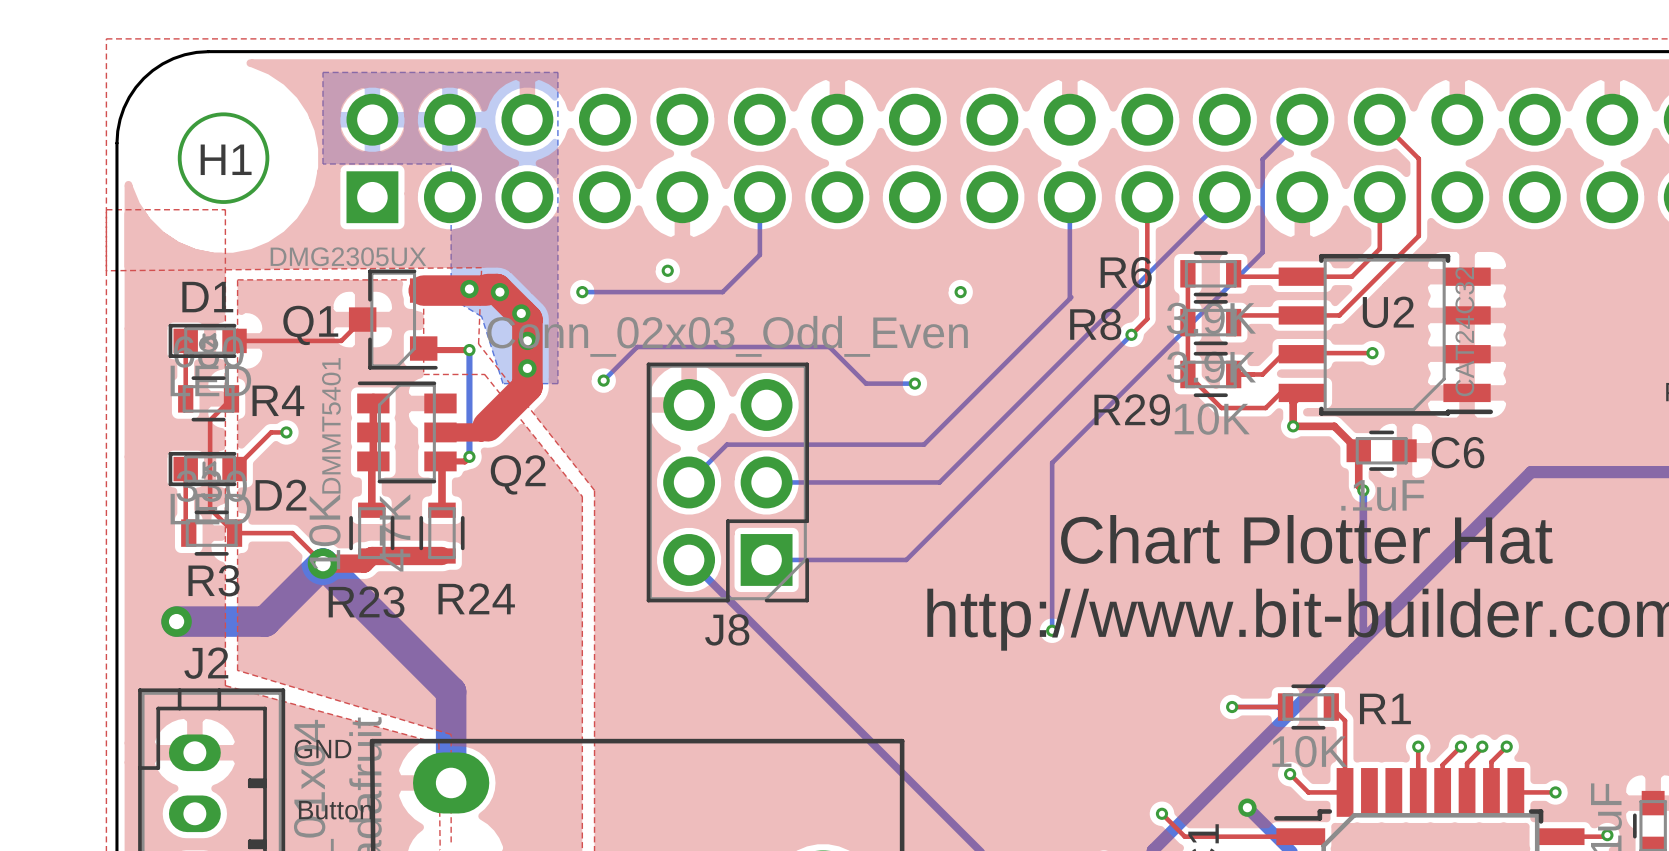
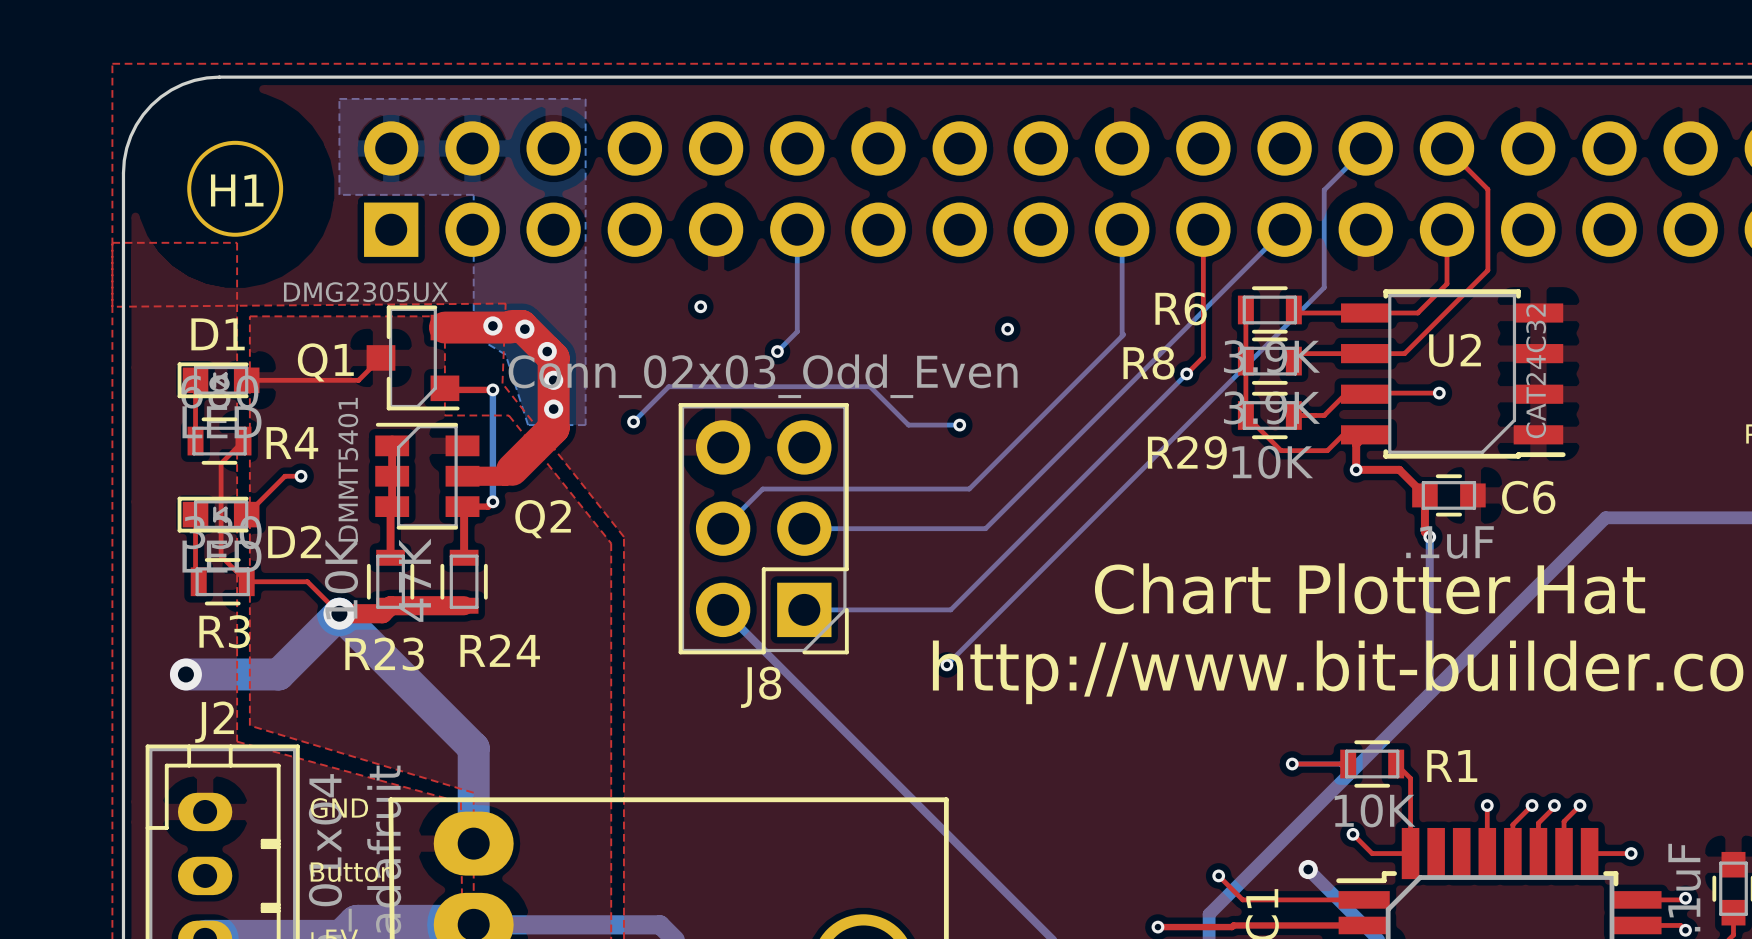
bottom track: (759, 254) (722, 292) (582, 292) -> (797, 290) (797, 331) (777, 351)
via position: (582, 292) -> (777, 351)
bottom track: (1052, 462) (1052, 630) -> (1103, 508) (946, 664)
via position: (1052, 630) -> (946, 664)

